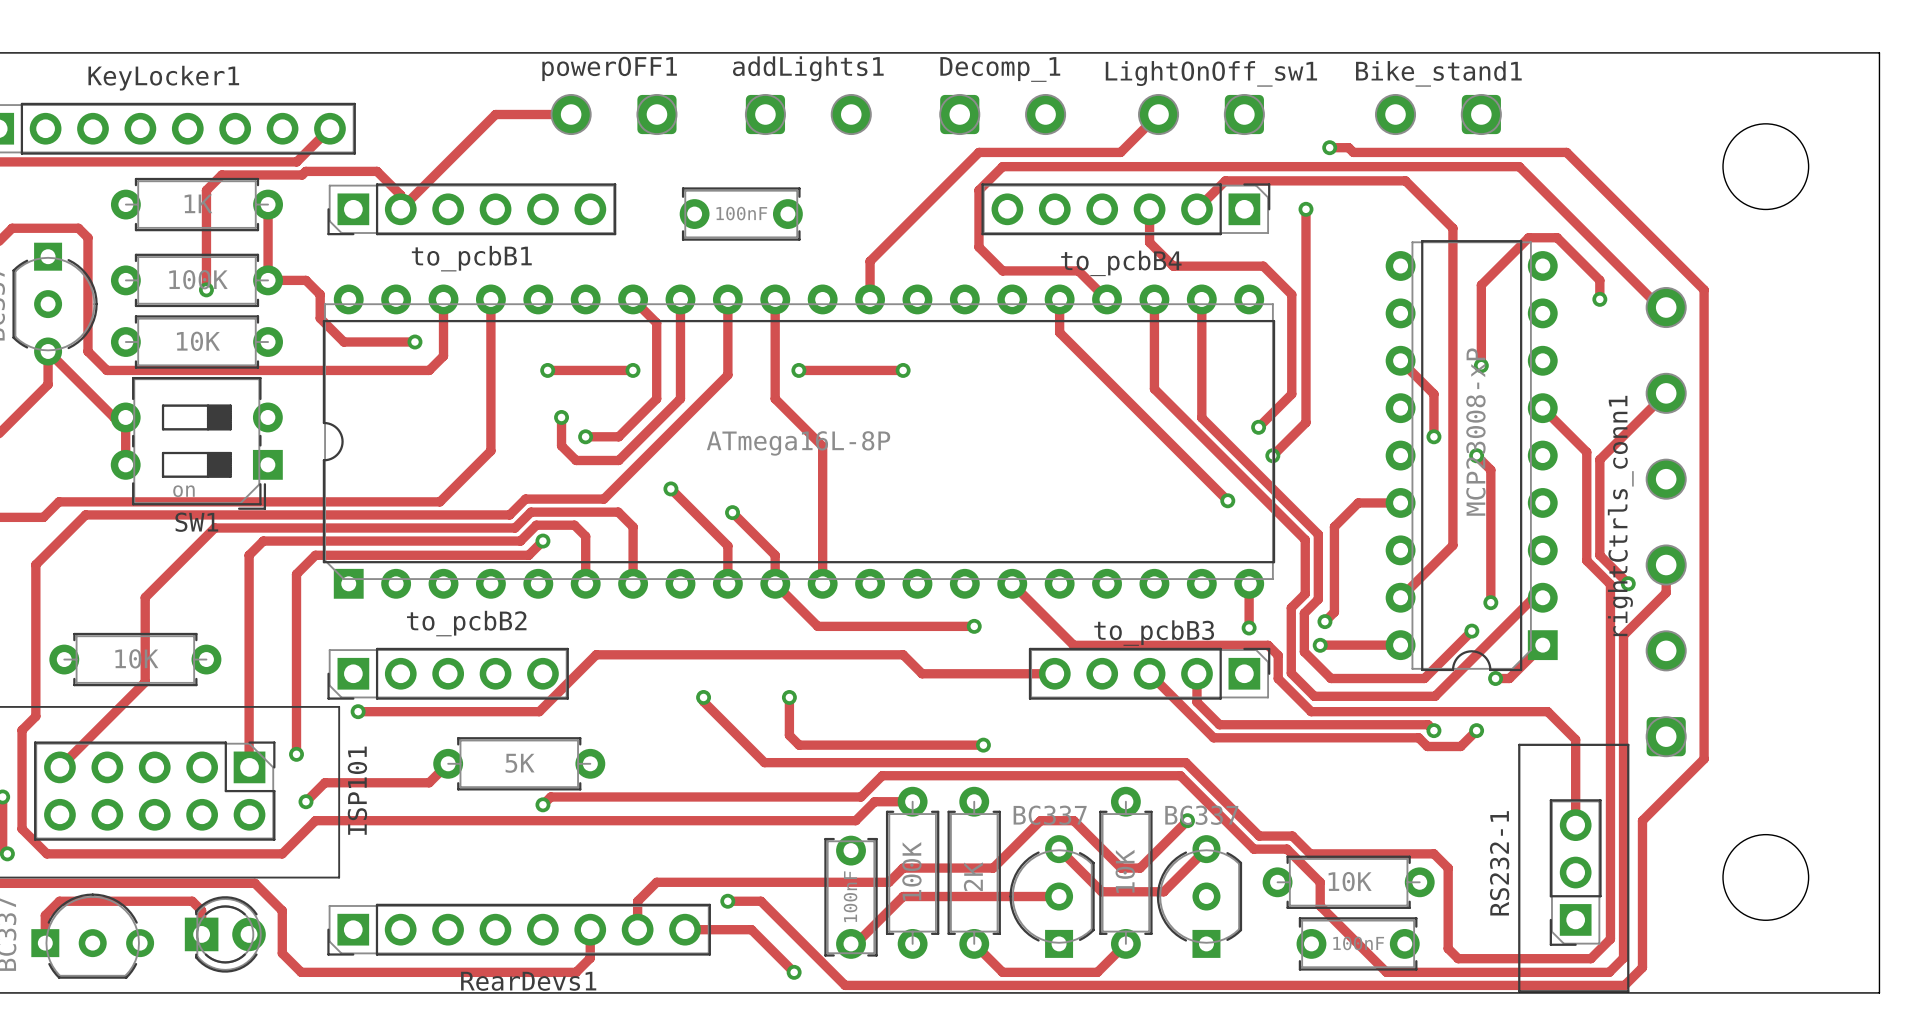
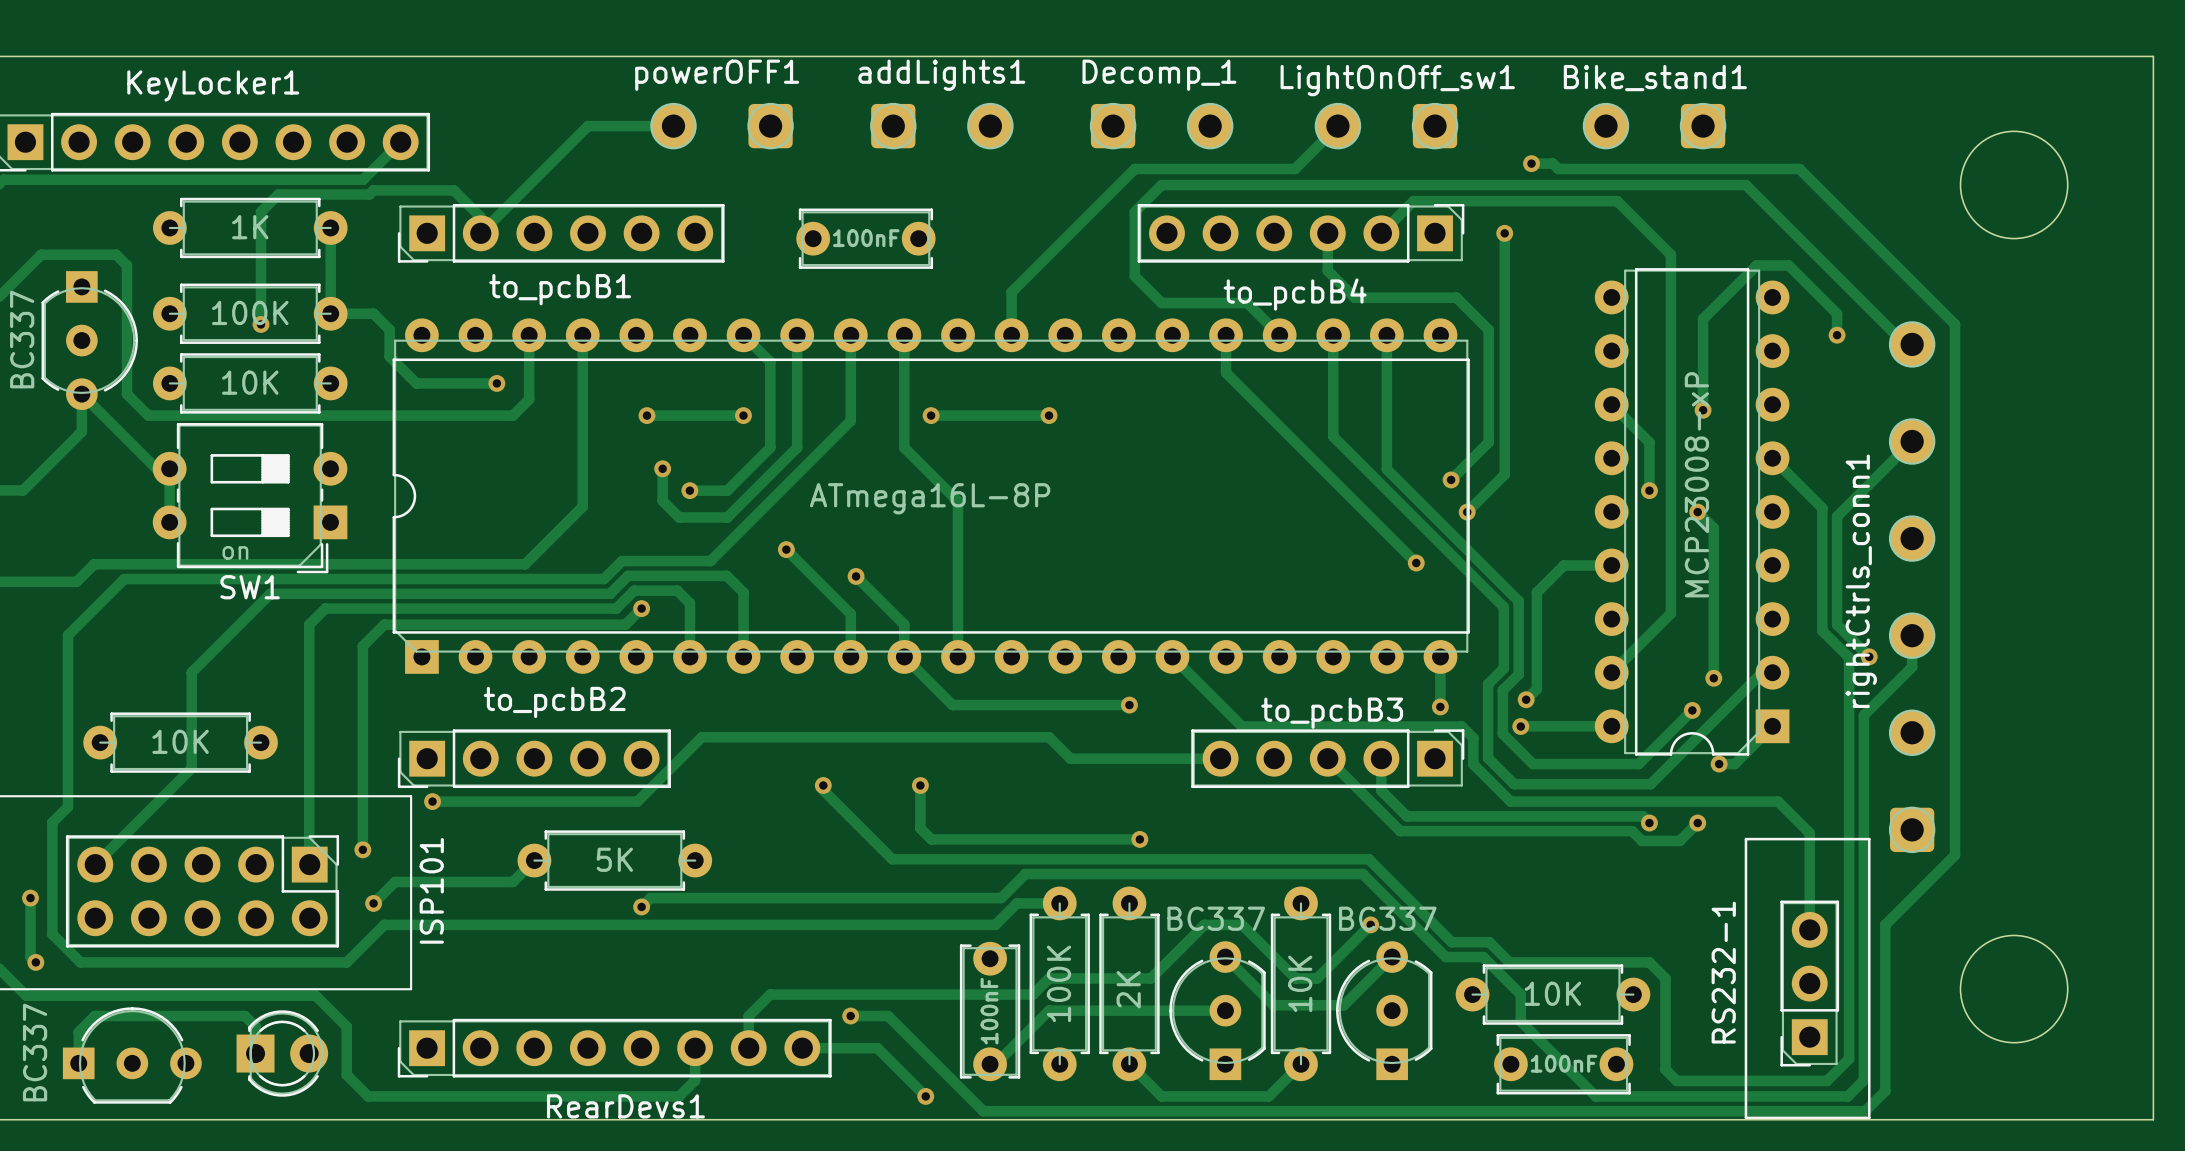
round board edge size: [1722, 123, 1810, 210] -> [1959, 130, 2069, 240]
round board edge size: [1722, 834, 1810, 921] -> [1959, 934, 2069, 1044]

